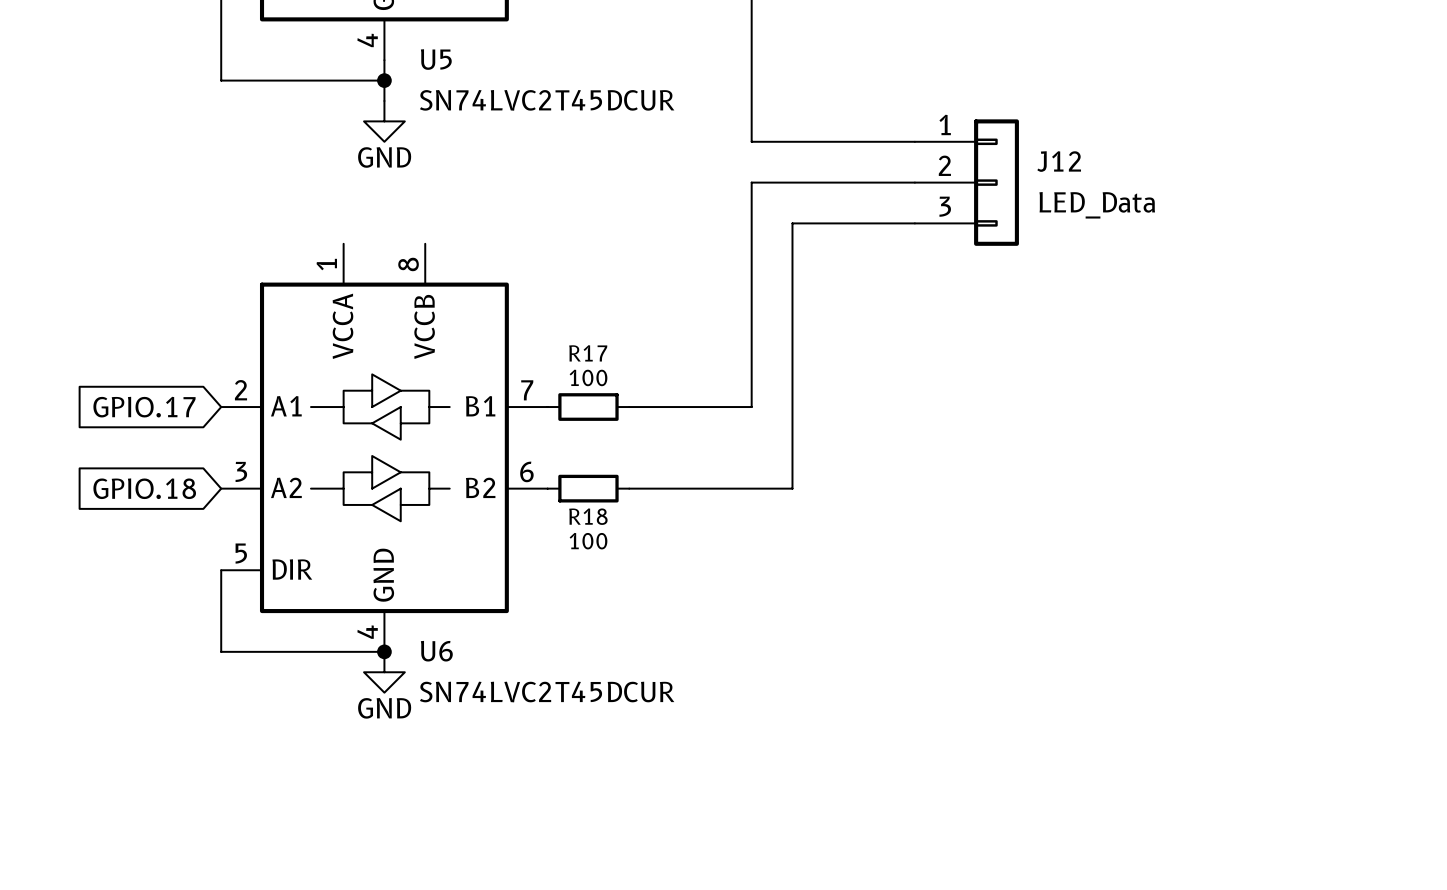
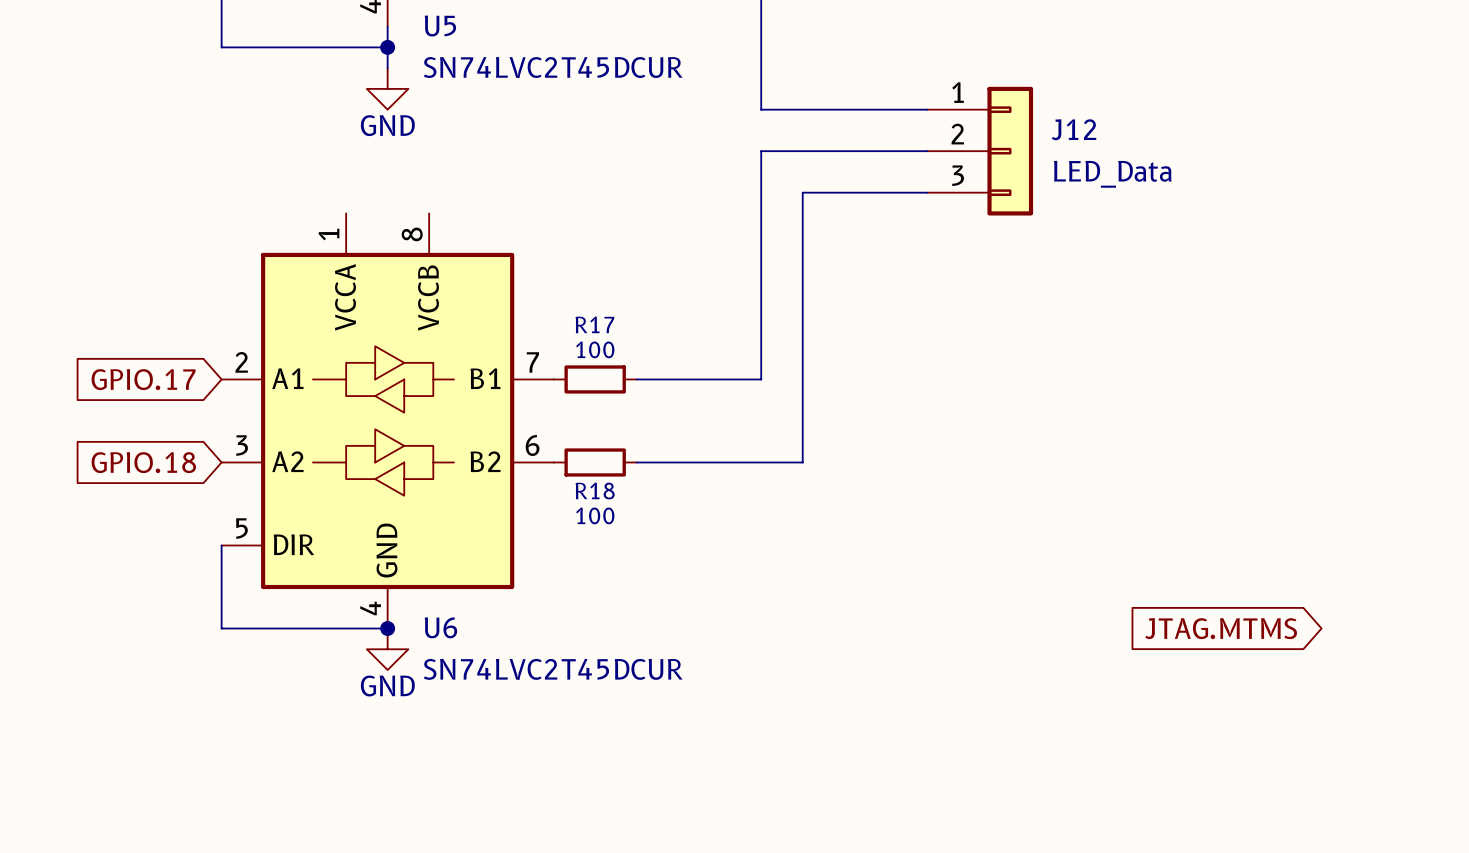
global label: none -> JTAG.MTMS (1221, 628)

